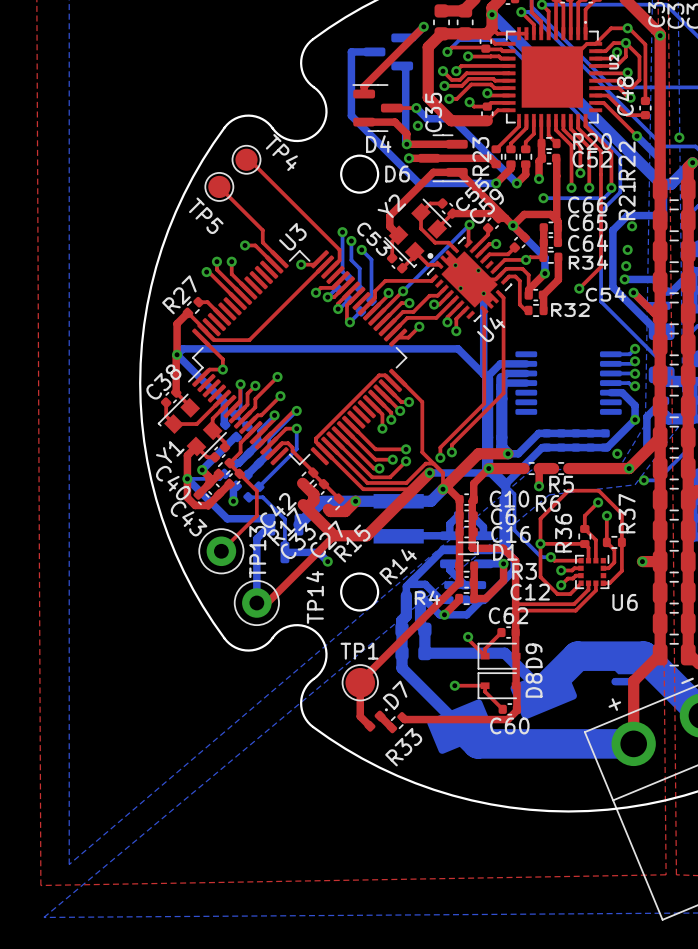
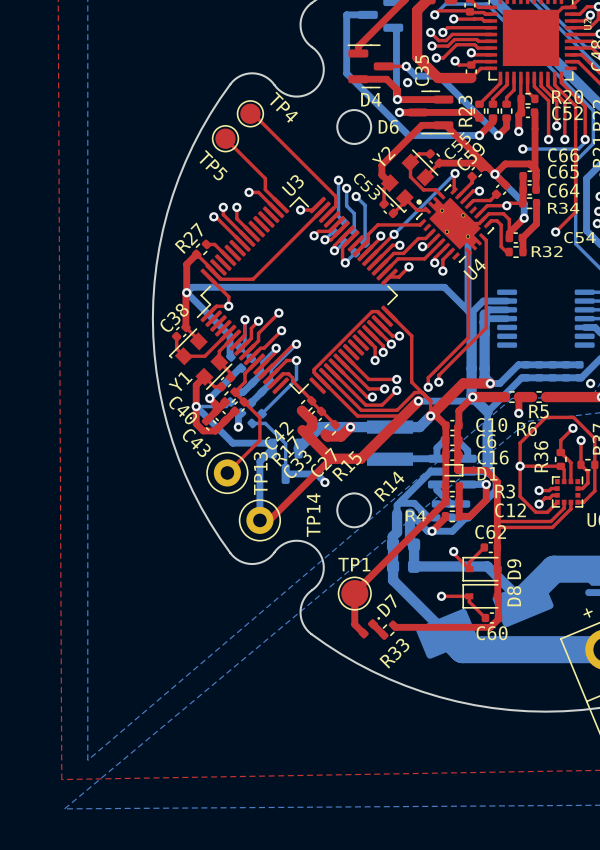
bottom track: (505, 484) (514, 494) (514, 530) (541, 557) (550, 557) -> none
top track: (550, 557) (554, 560) (581, 560) -> none
via: (550, 557) -> none

